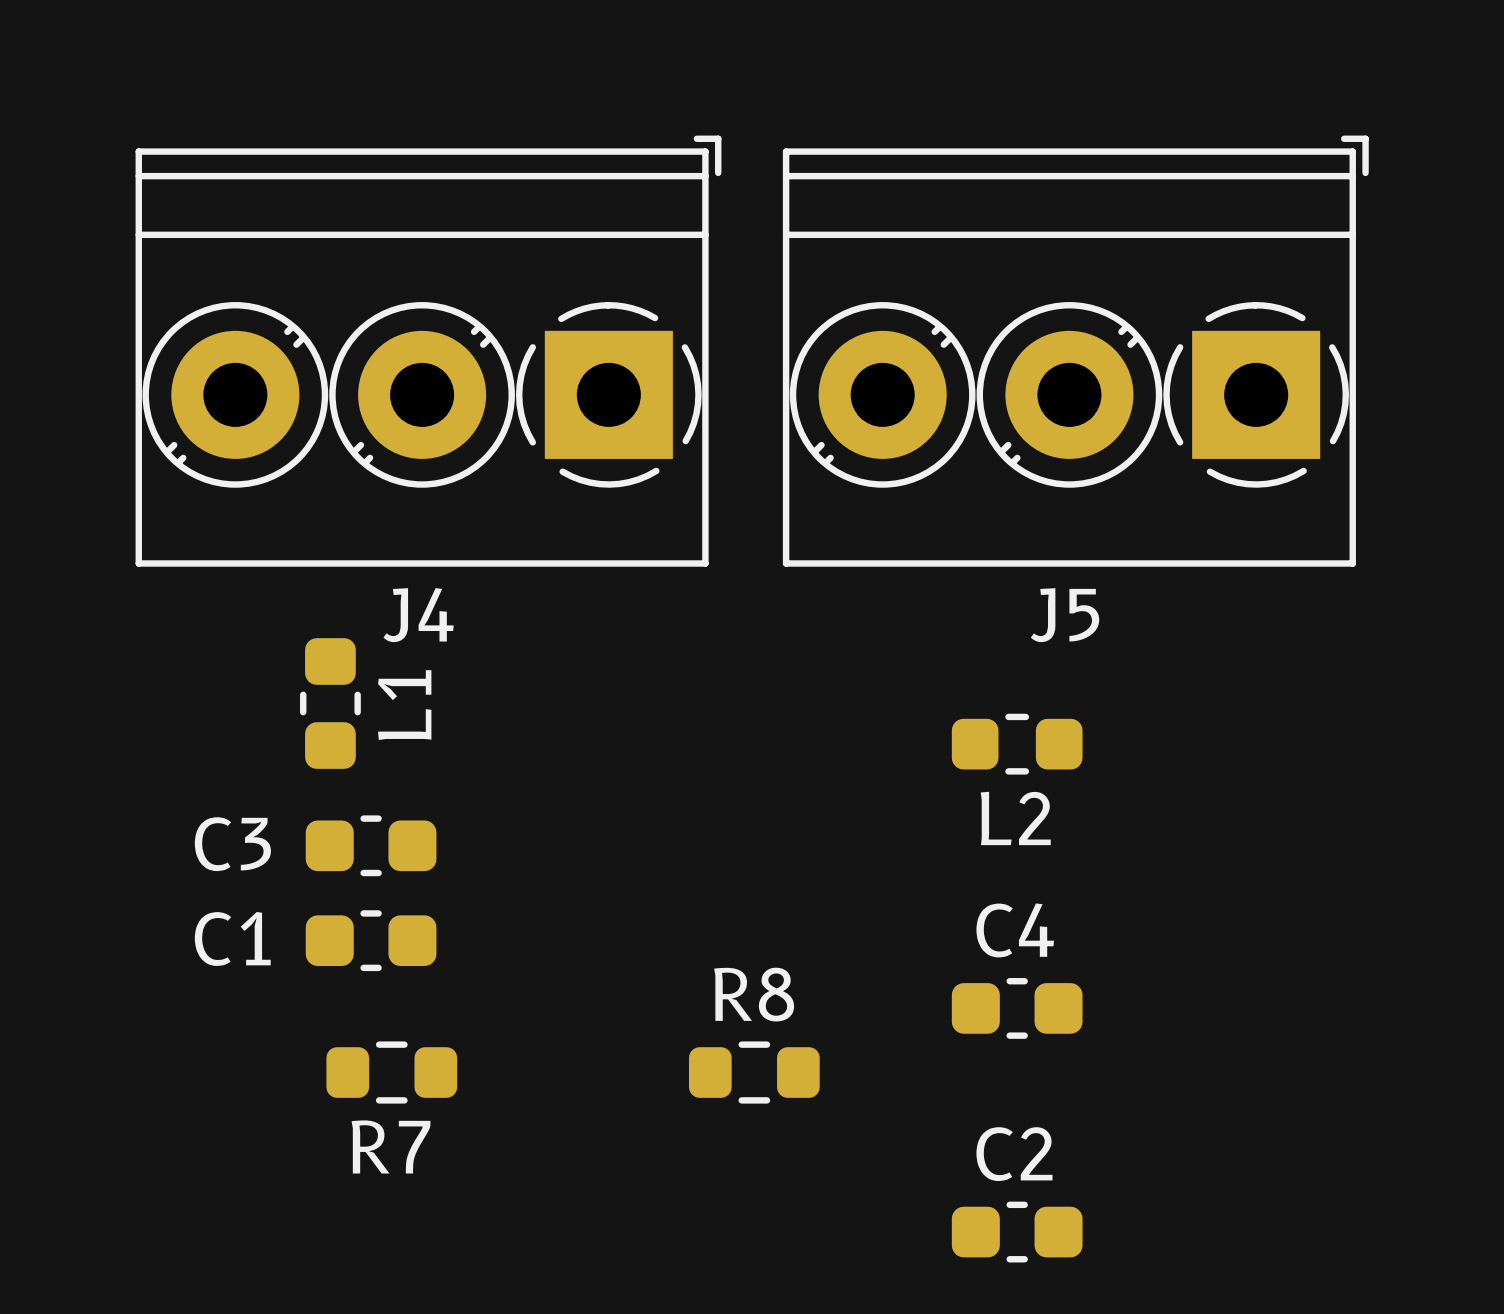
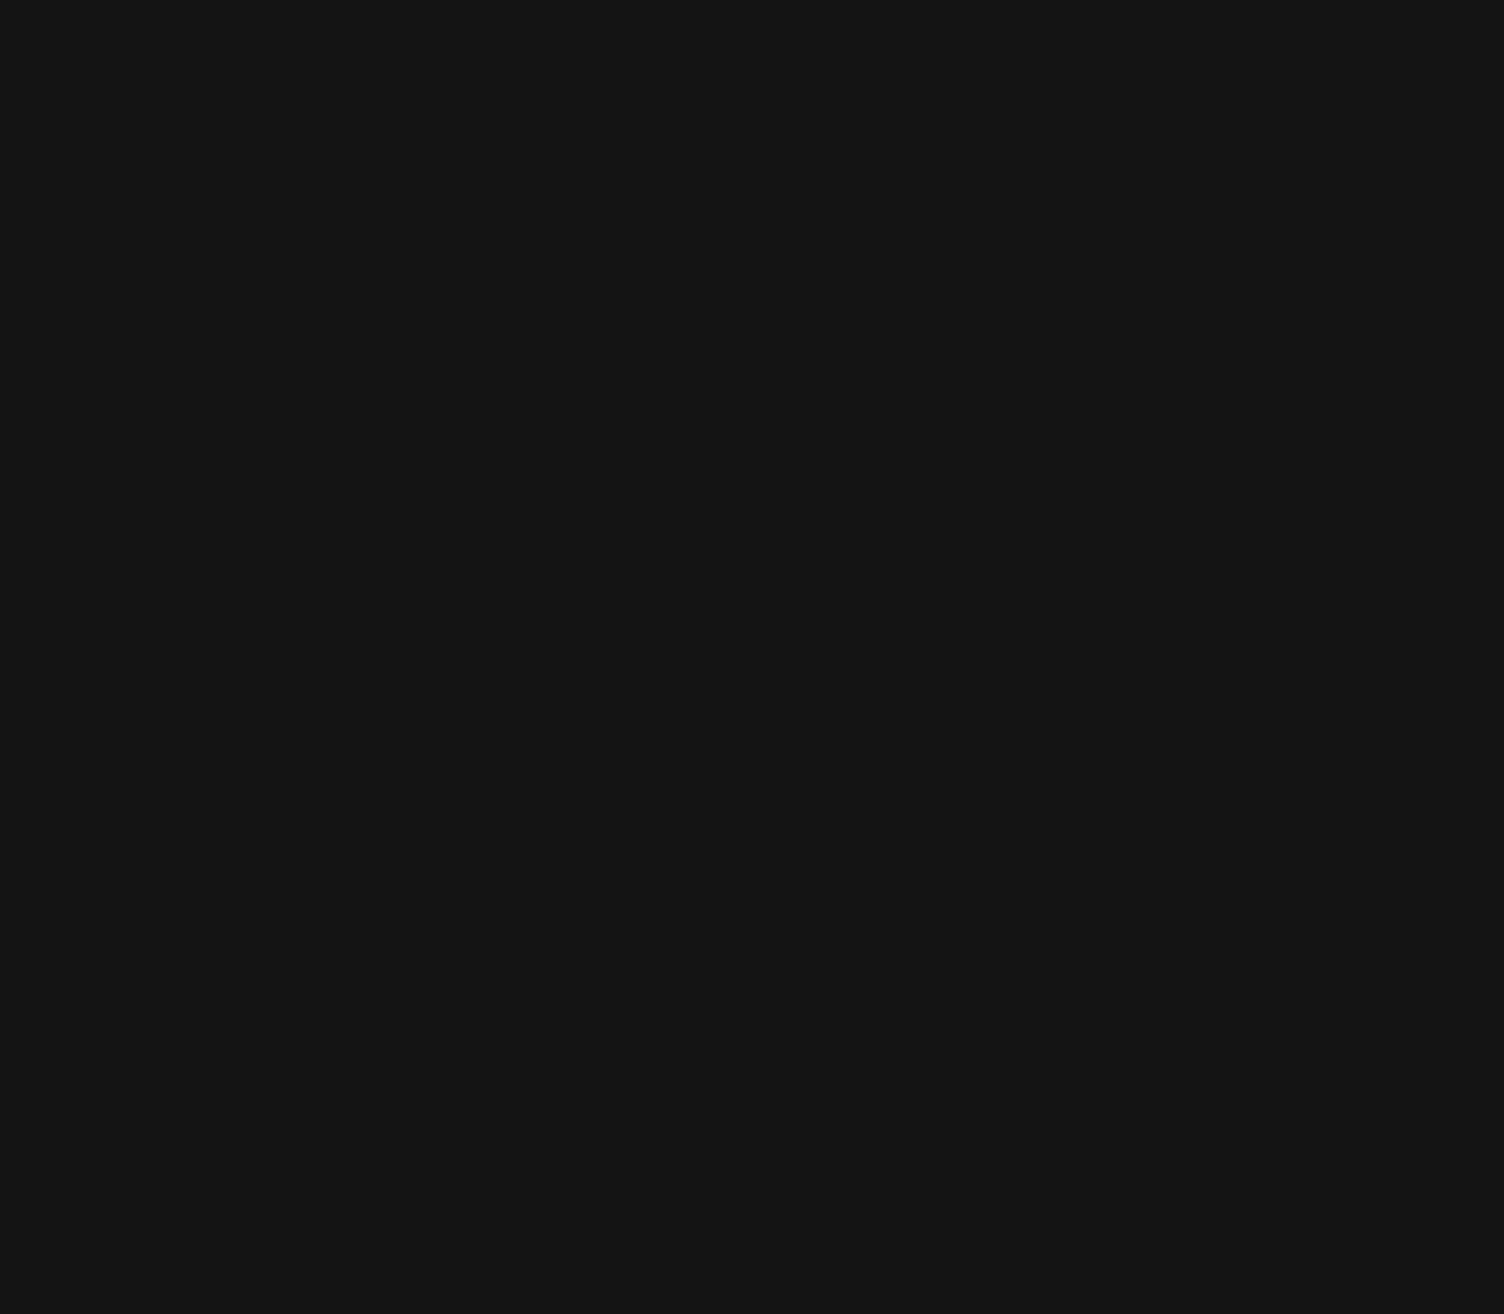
J4: (428, 351) -> none
J5: (1075, 351) -> none
L1: (330, 703) -> none
L2: (1017, 744) -> none
C3: (371, 845) -> none
C1: (371, 940) -> none
C4: (1017, 1008) -> none
R7: (391, 1072) -> none
R8: (754, 1072) -> none
C2: (1017, 1232) -> none

